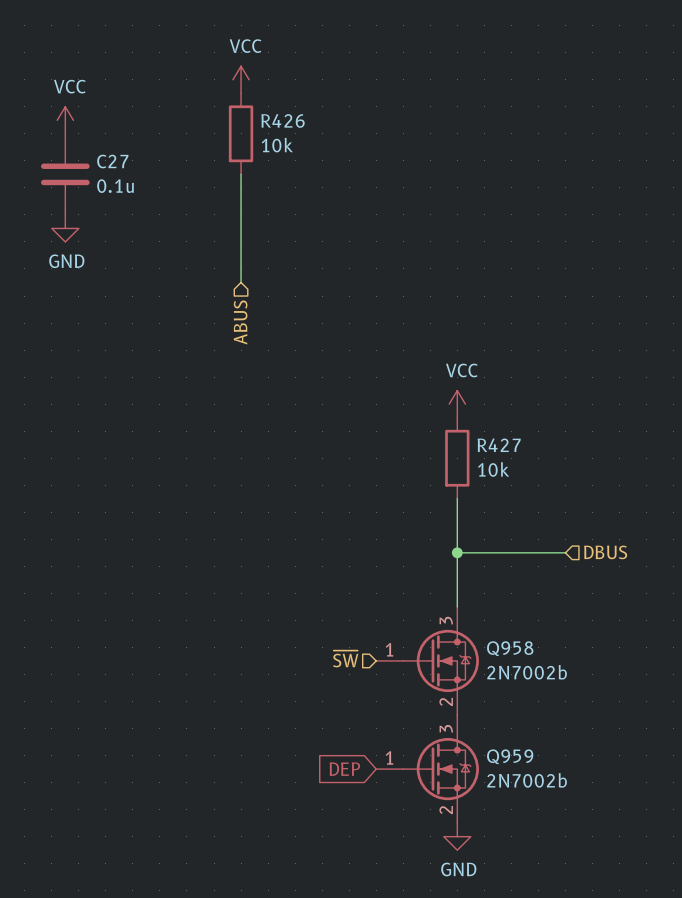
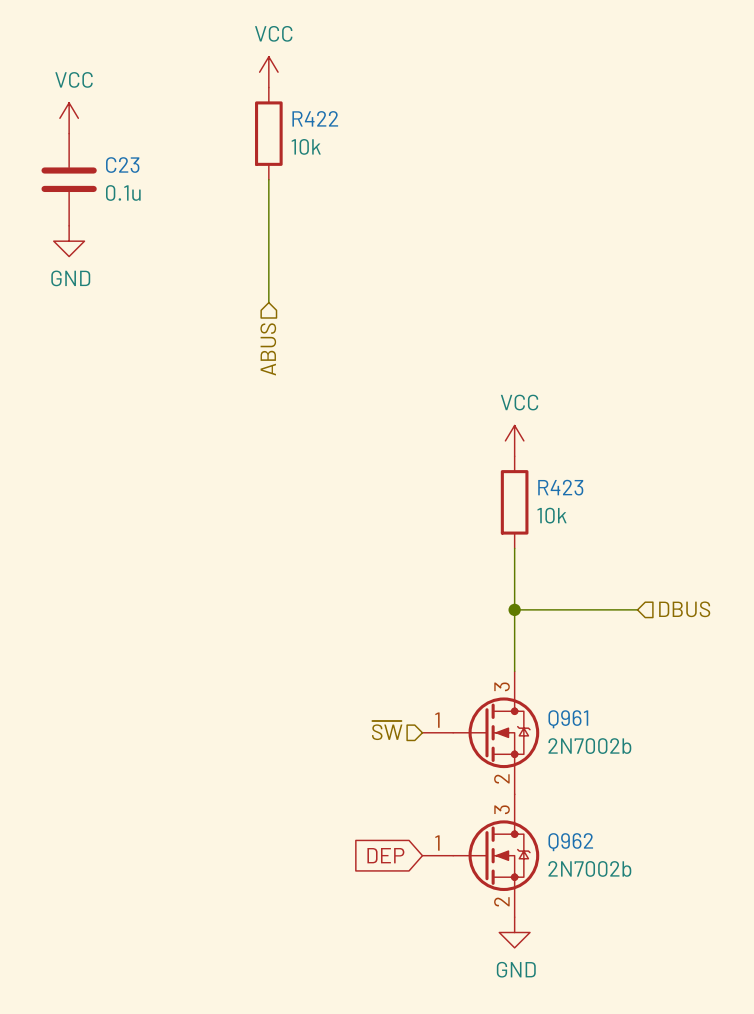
R426 name: R426 (283, 120) -> R422 (315, 118)
C27 name: C27 (112, 161) -> C23 (122, 165)
R427 name: R427 (499, 445) -> R423 (560, 487)
Q958 name: Q958 (510, 648) -> Q961 (568, 719)
Q959 name: Q959 (510, 756) -> Q962 (570, 842)

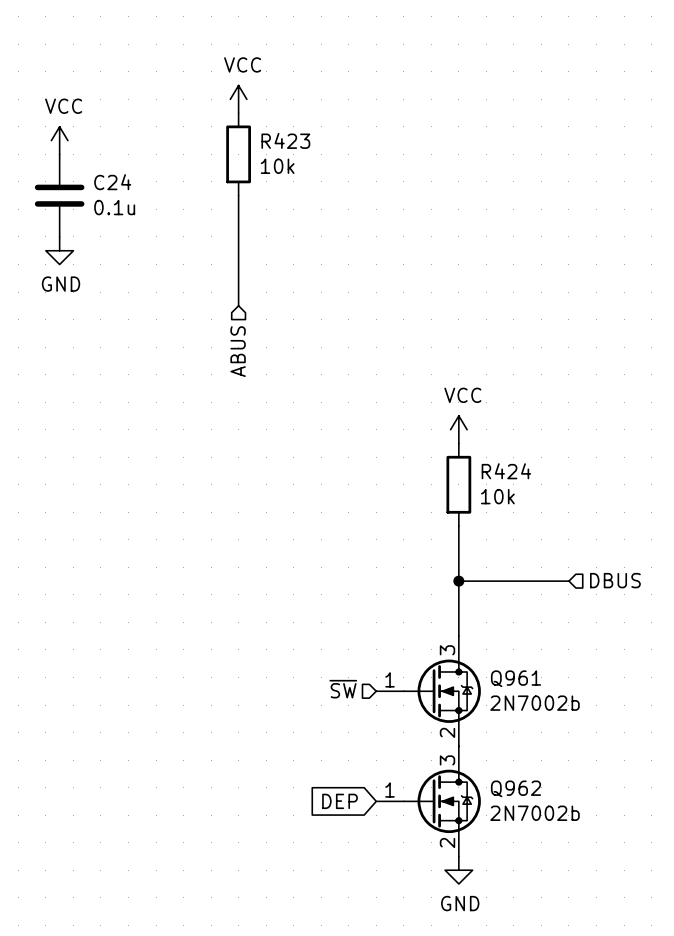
R422 name: R422 (315, 118) -> R423 (285, 140)
C23 name: C23 (122, 165) -> C24 (112, 182)
R423 name: R423 (560, 487) -> R424 (506, 471)

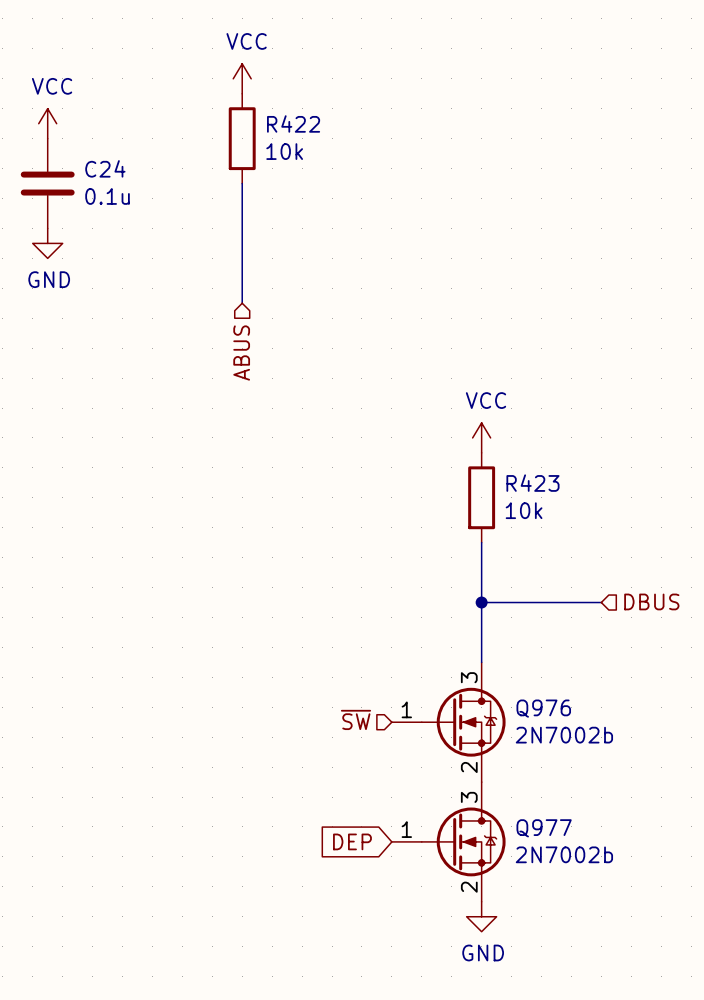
R423 name: R423 (285, 140) -> R422 (293, 123)
R424 name: R424 (506, 471) -> R423 (532, 483)
Q961 name: Q961 (515, 678) -> Q976 (543, 708)
Q962 name: Q962 (515, 788) -> Q977 (544, 828)

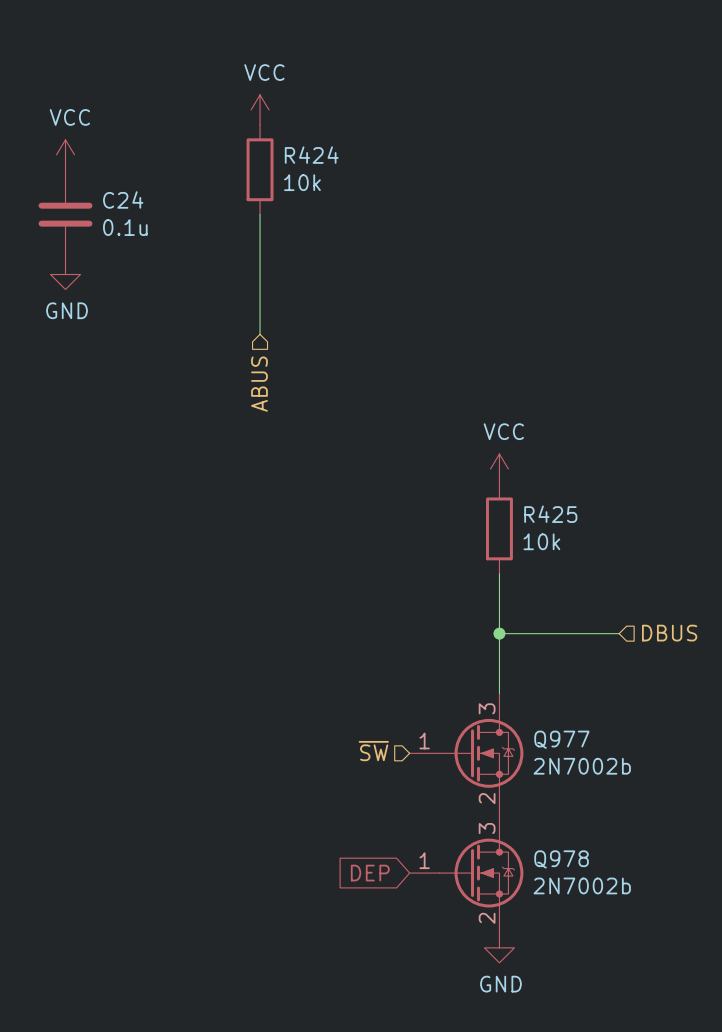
R422 name: R422 (293, 123) -> R424 (311, 155)
R423 name: R423 (532, 483) -> R425 (550, 514)
Q976 name: Q976 (543, 708) -> Q977 (561, 739)
Q977 name: Q977 (544, 828) -> Q978 (561, 859)

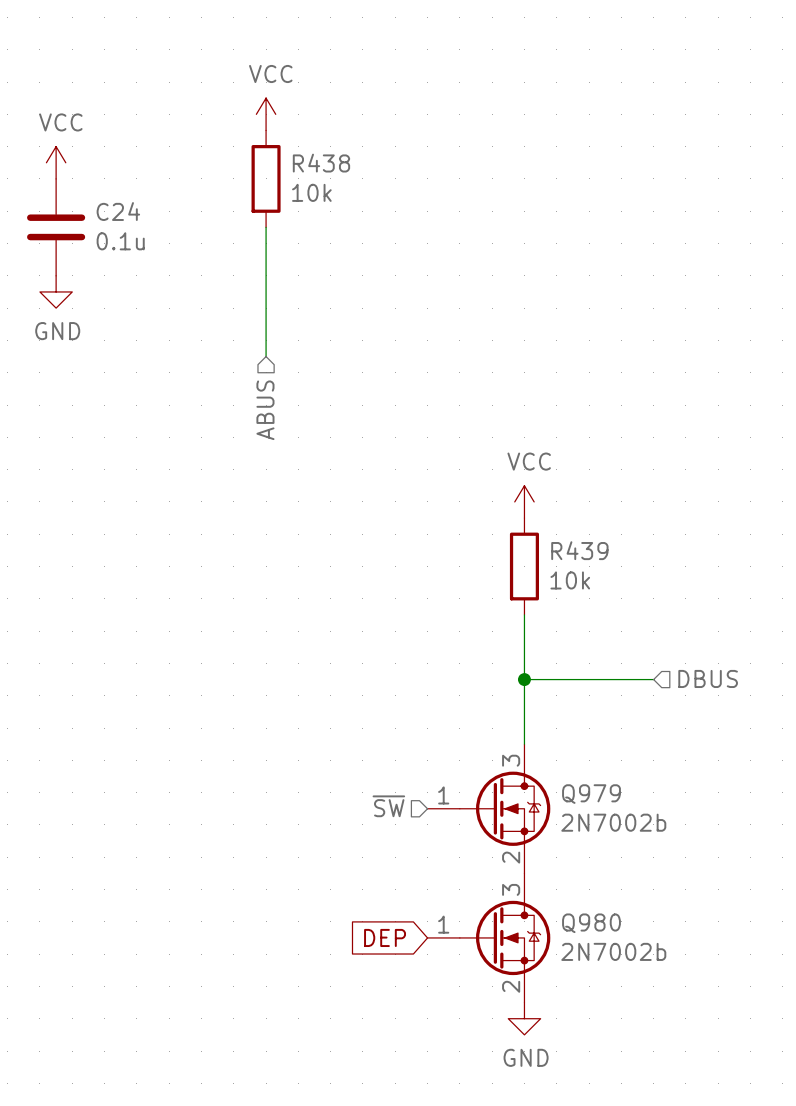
R424 name: R424 (311, 155) -> R438 (321, 163)
R425 name: R425 (550, 514) -> R439 (579, 550)
Q977 name: Q977 (561, 739) -> Q979 (591, 794)
Q978 name: Q978 (561, 859) -> Q980 (591, 923)

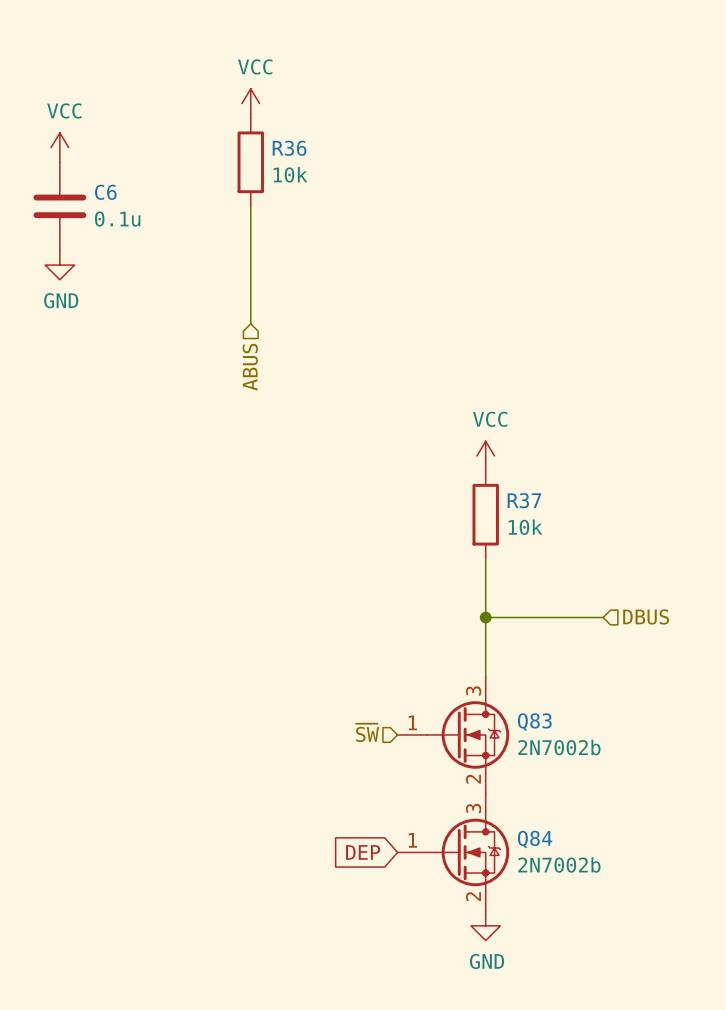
R438 name: R438 (321, 163) -> R36 (289, 148)
C24 name: C24 (118, 211) -> C6 (105, 192)
R439 name: R439 (579, 550) -> R37 (524, 500)
Q979 name: Q979 (591, 794) -> Q83 (534, 722)
Q980 name: Q980 (591, 923) -> Q84 (535, 839)

